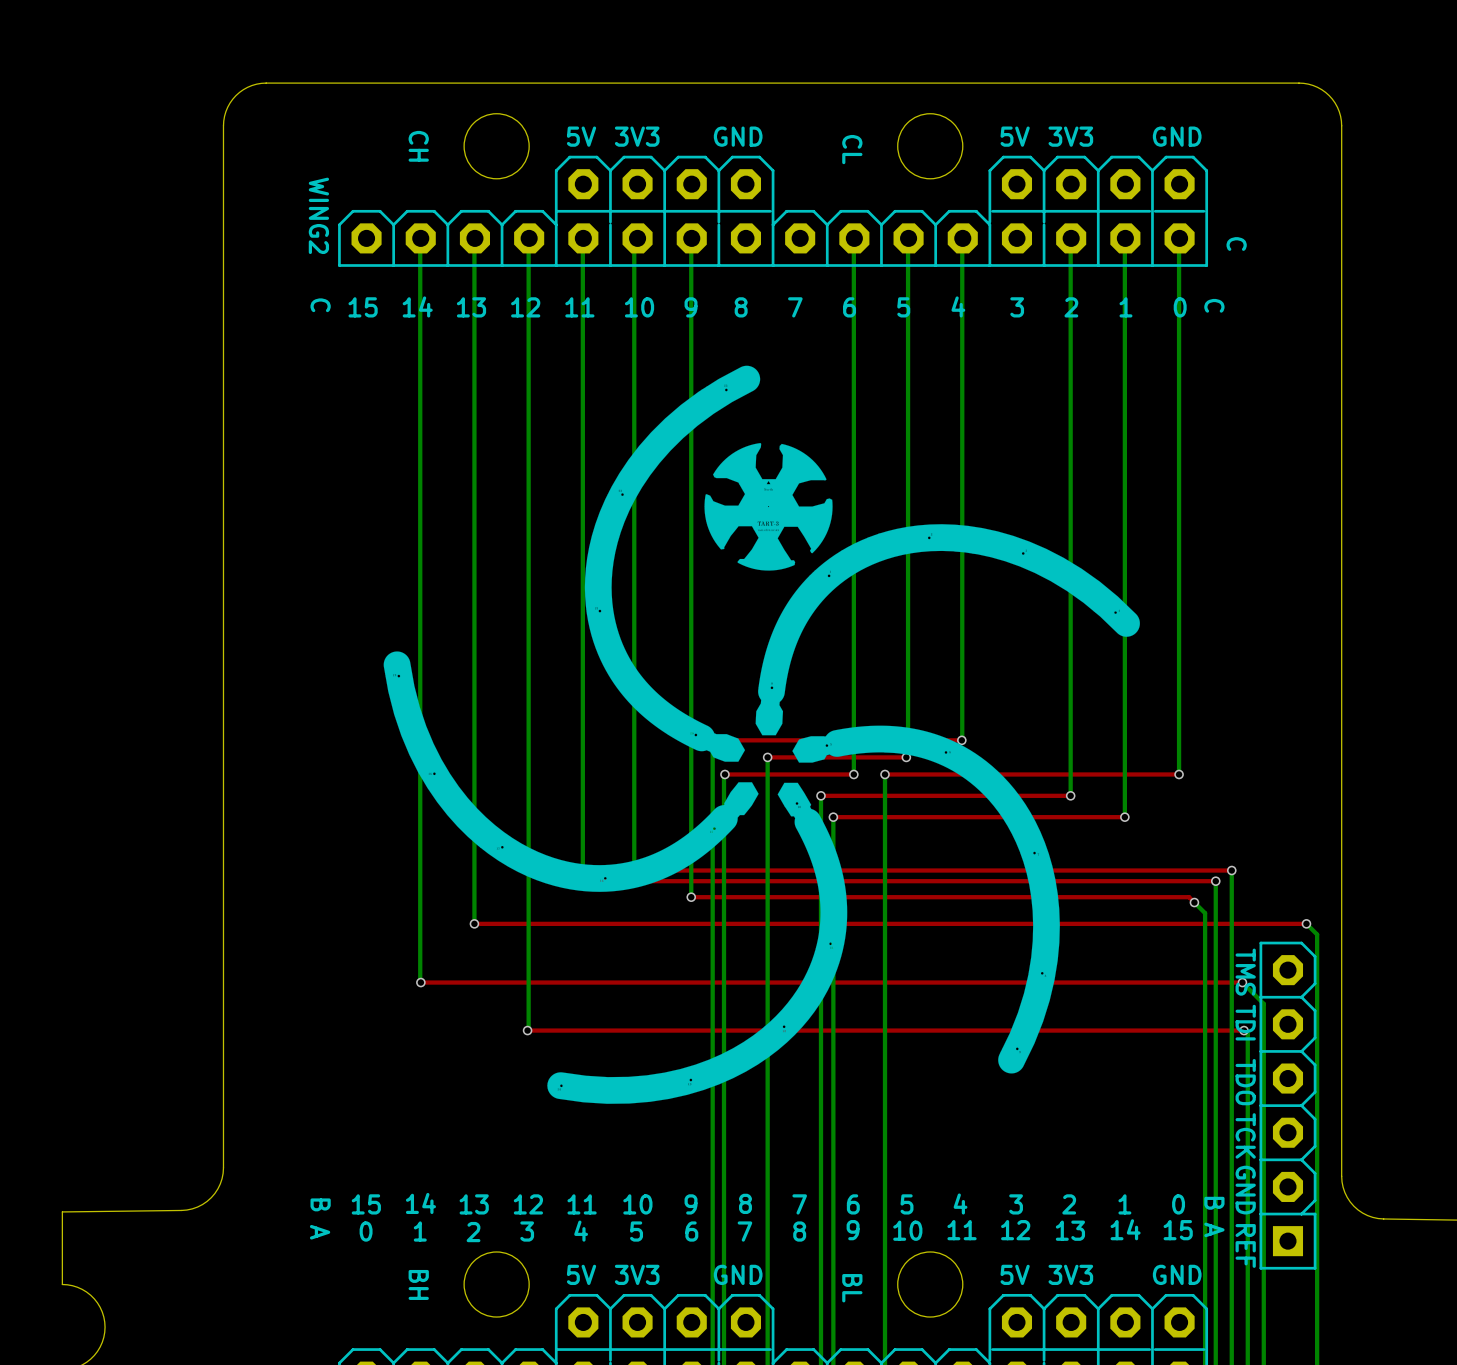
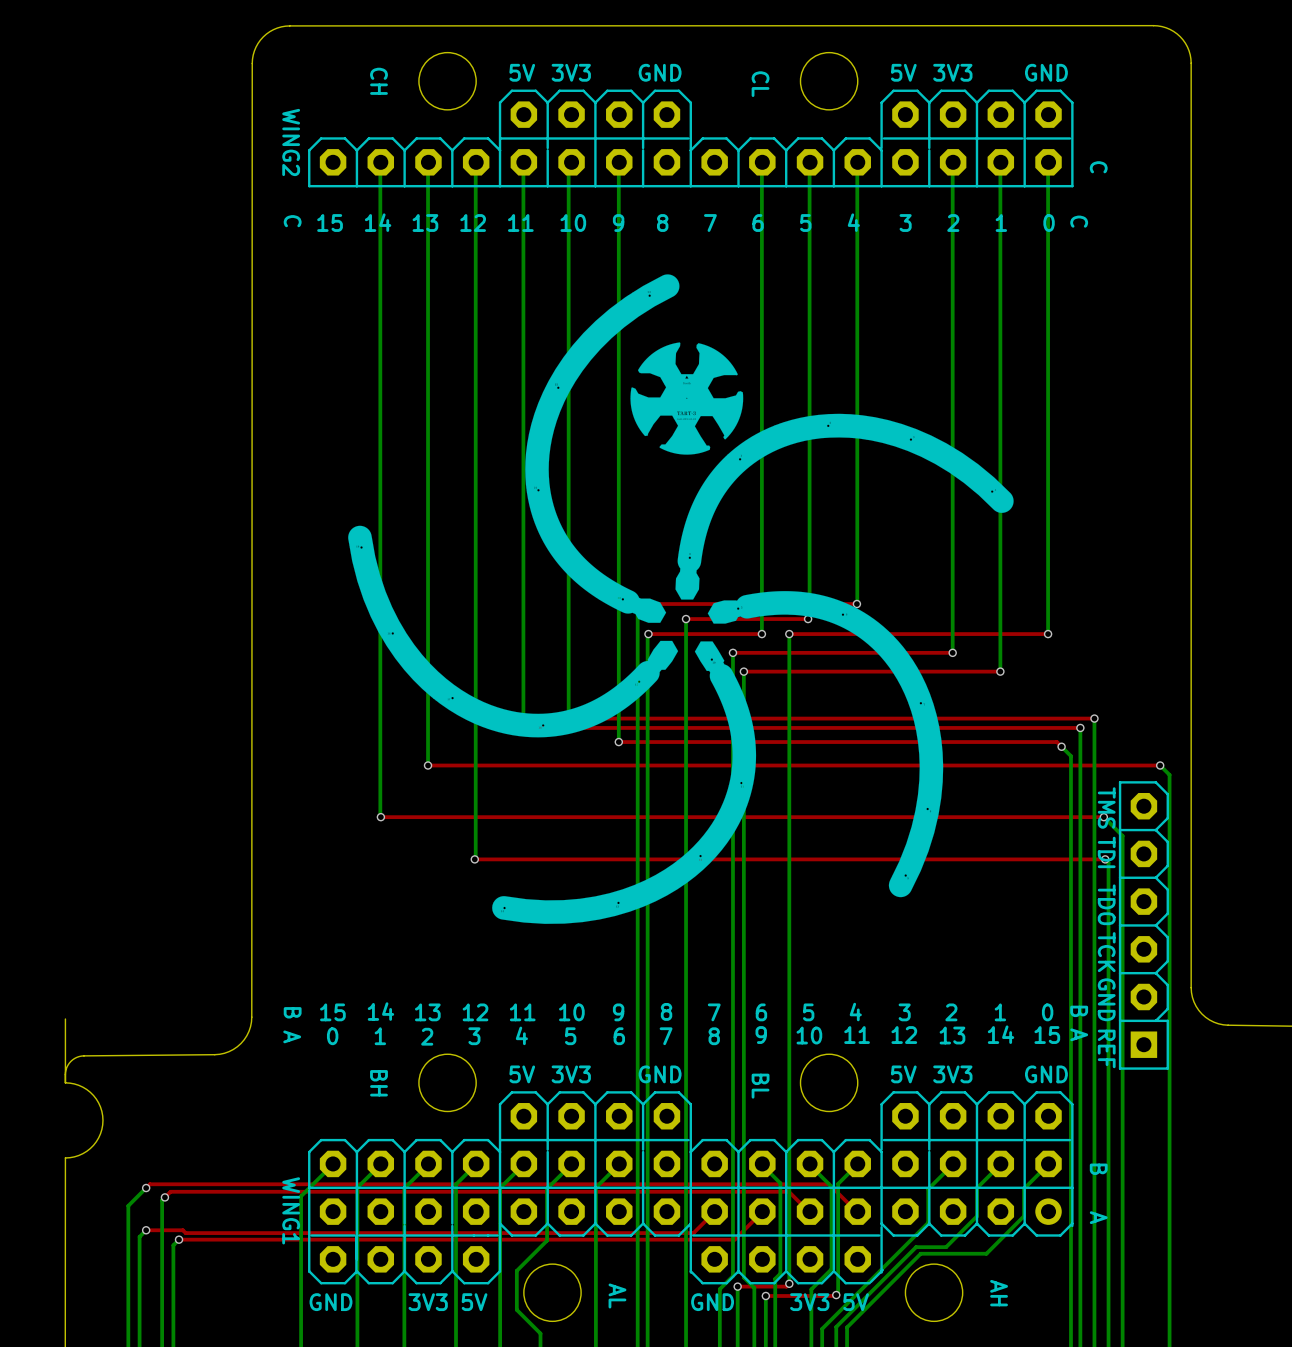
board edge: (1298, 83) (266, 83) (247, 87) (235, 95) (225, 111) (223, 125) (223, 1173) (217, 1188) (211, 1197) (192, 1208) (62, 1211) -> (1153, 25) (289, 25) (273, 29) (263, 36) (254, 51) (252, 63) (251, 1021) (244, 1039) (237, 1046) (224, 1053) (81, 1056) (72, 1059) (67, 1065) (65, 1082)

